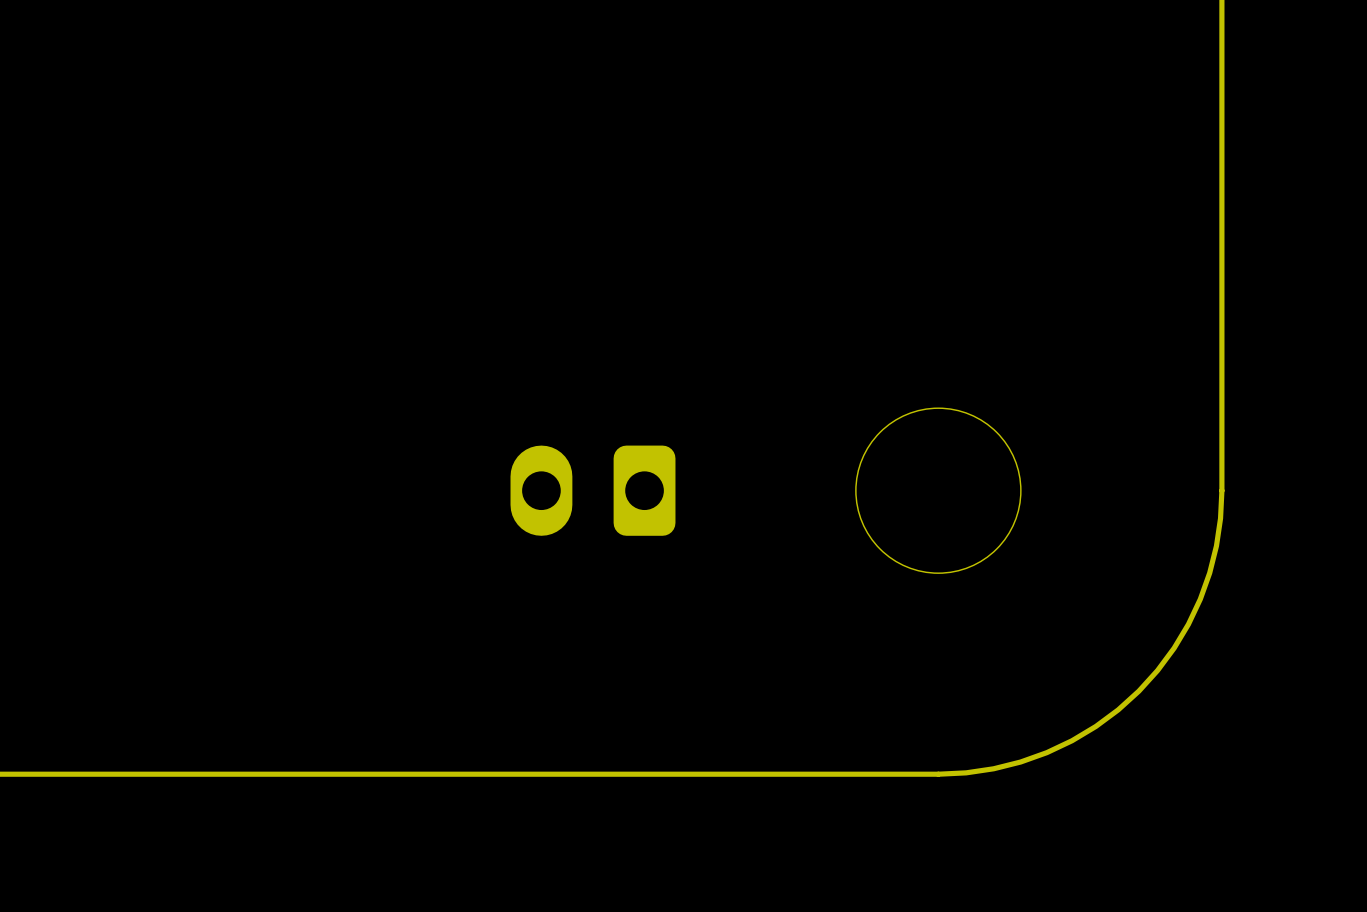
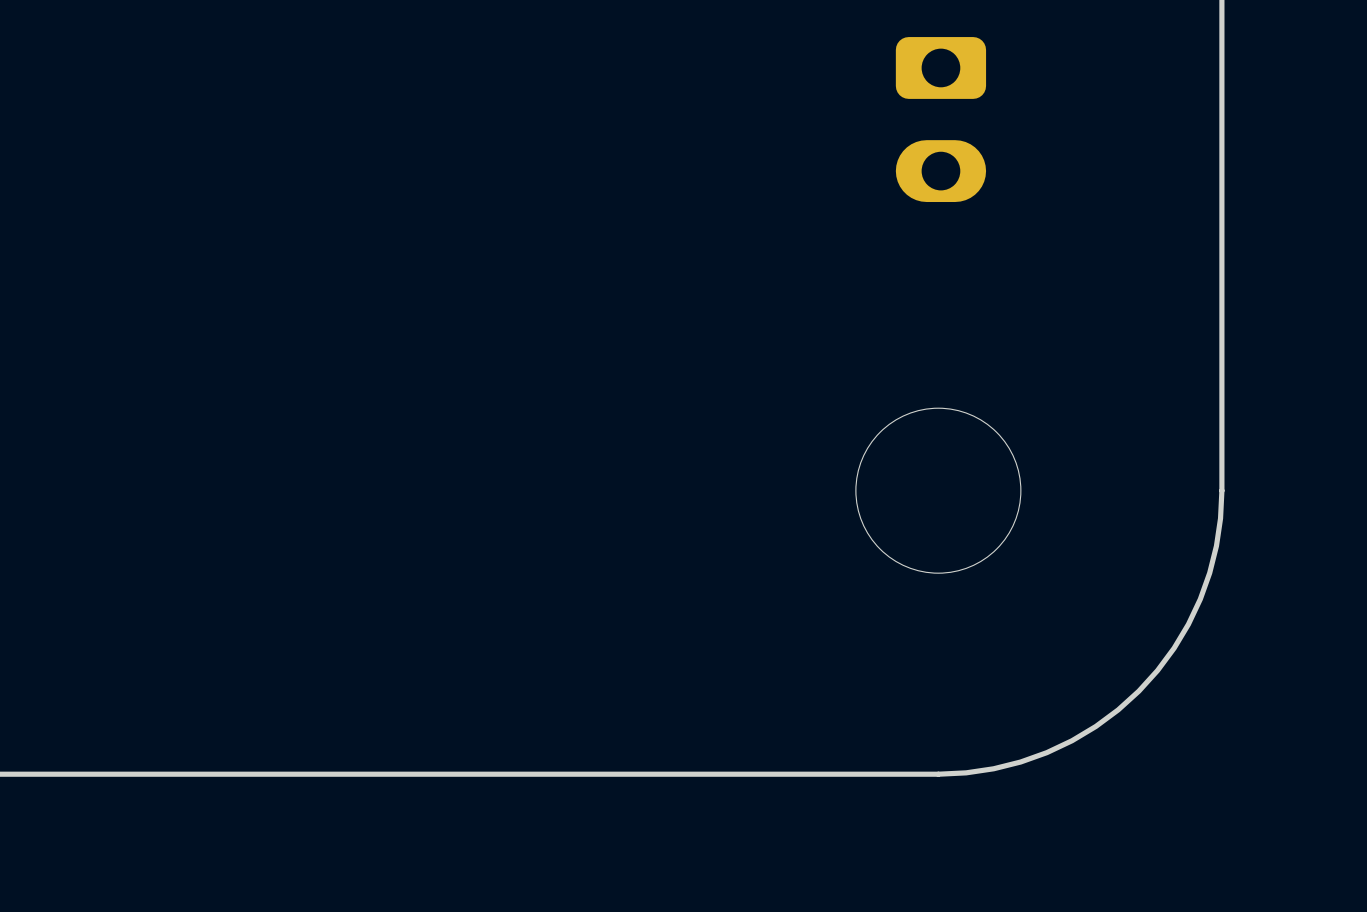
part rotation: 0° (592, 490) -> 90° counterclockwise (940, 119)
part position: (592, 490) -> (940, 119)

